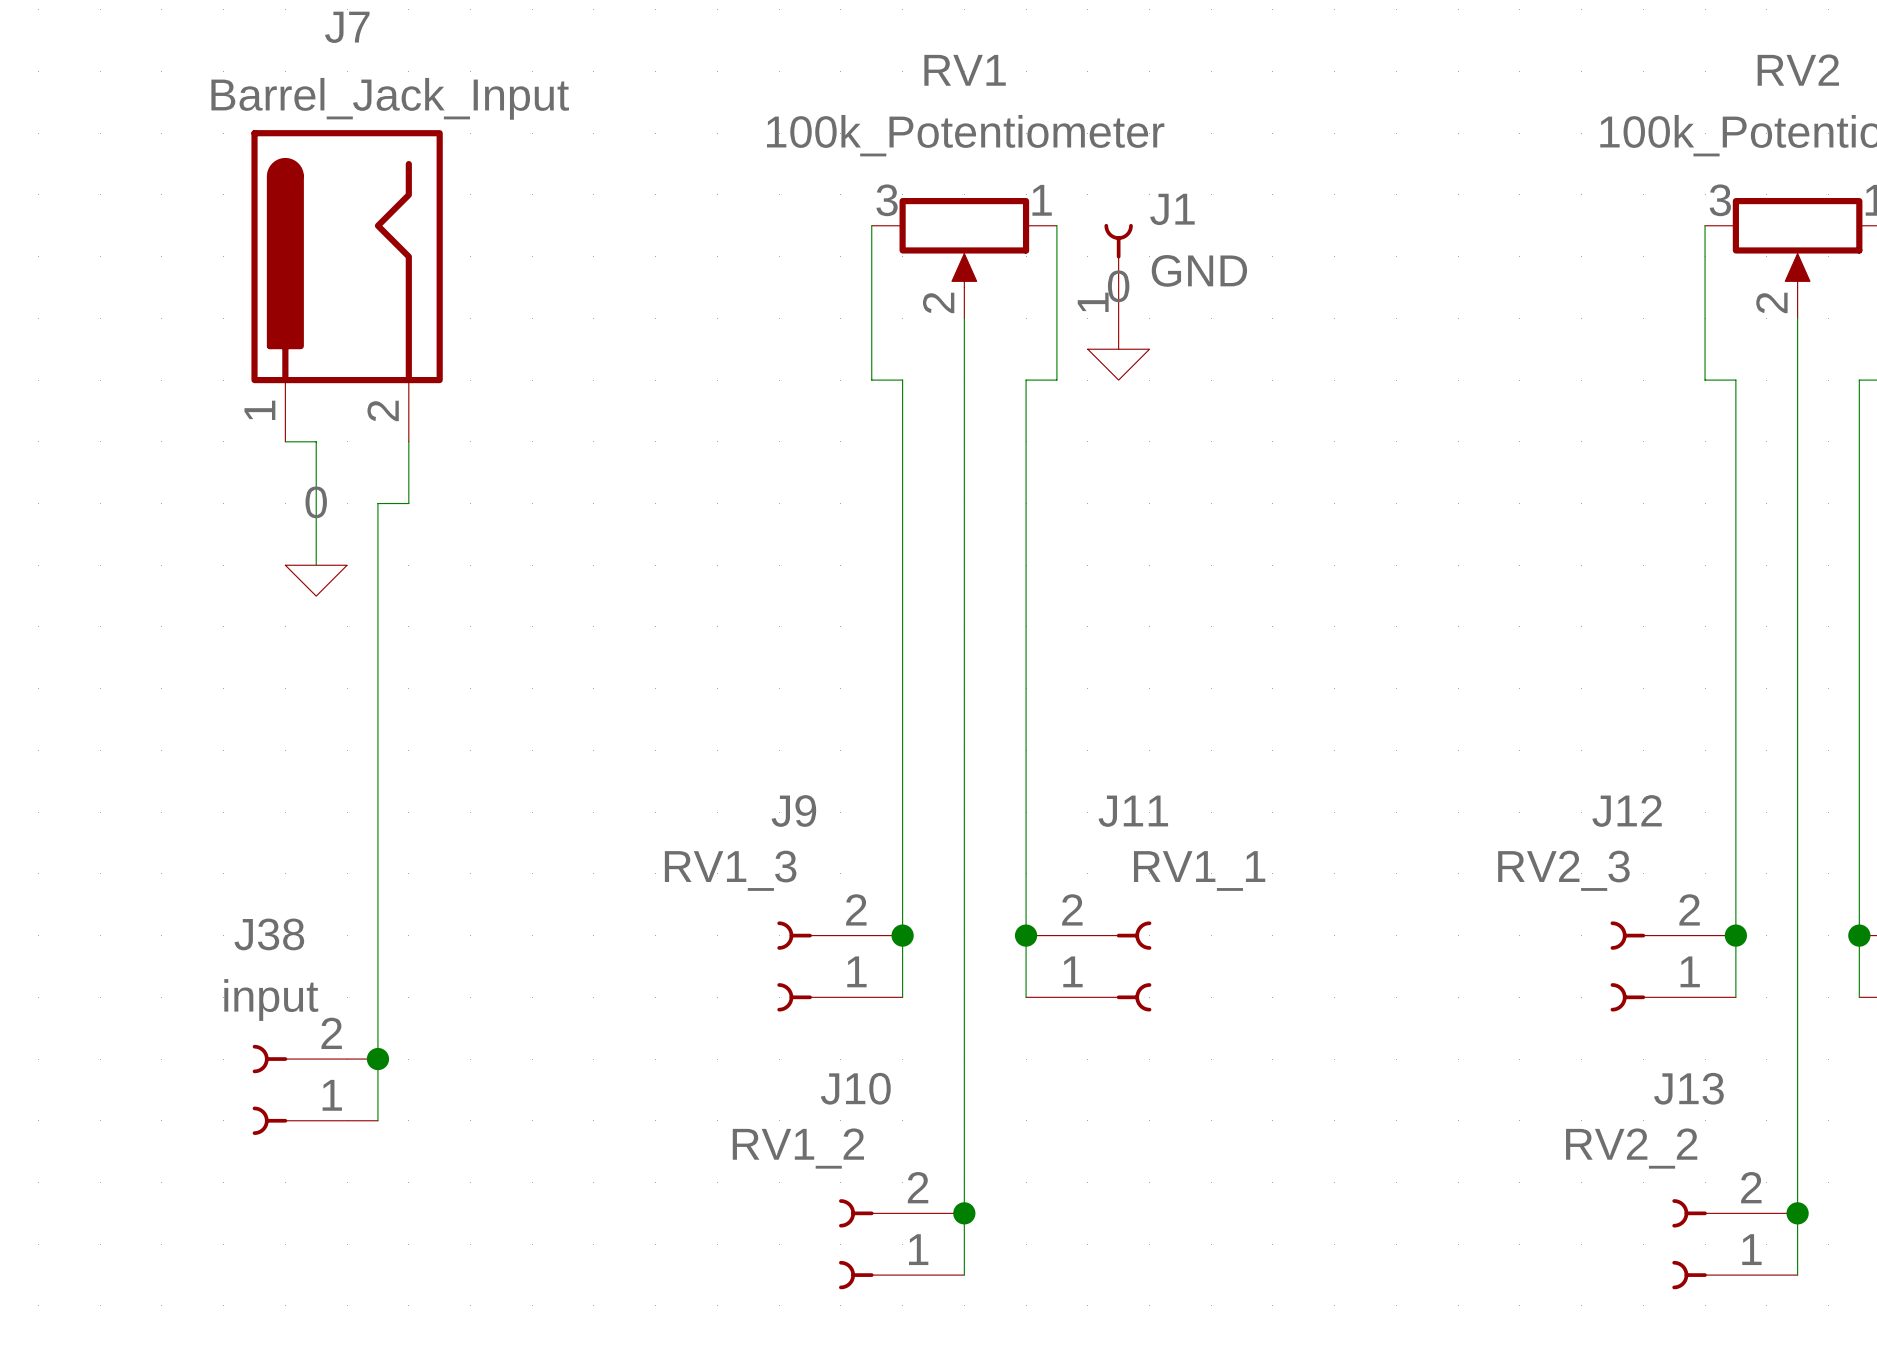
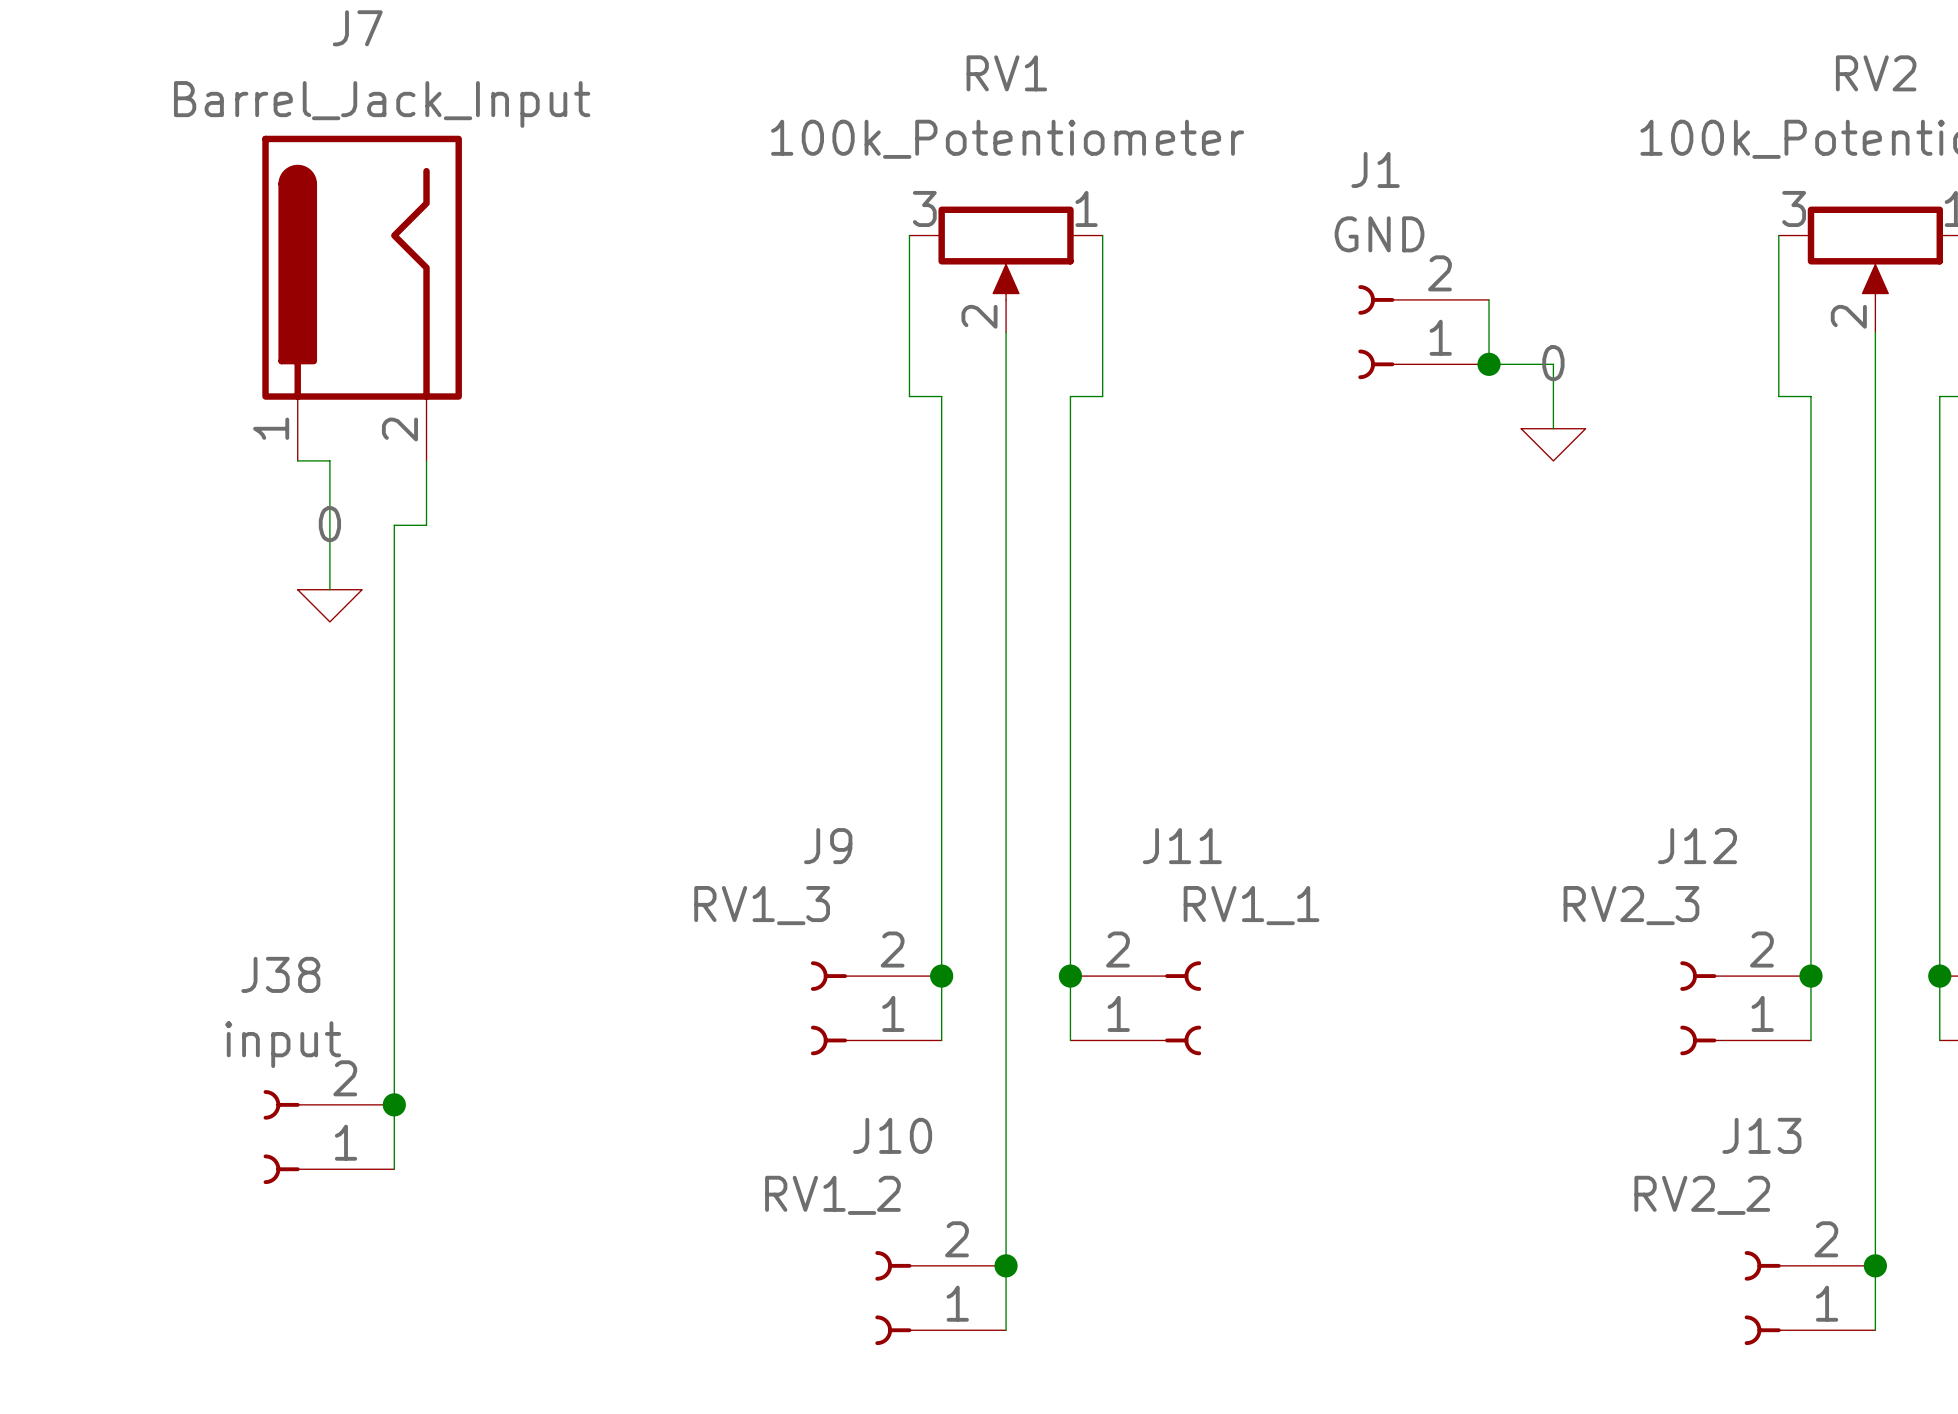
J1 name position: J1 (1172, 209) -> J1 (1375, 169)
J1 symbol: [1104, 223, 1133, 350] -> [1358, 285, 1490, 380]
J1 value position: GND (1199, 270) -> GND (1379, 234)
wire: none -> (1489, 299) (1489, 364) (1553, 364) (1553, 428)
junction: none -> (1489, 364)
power symbol position: 0 (1118, 364) -> 0 (1553, 444)

